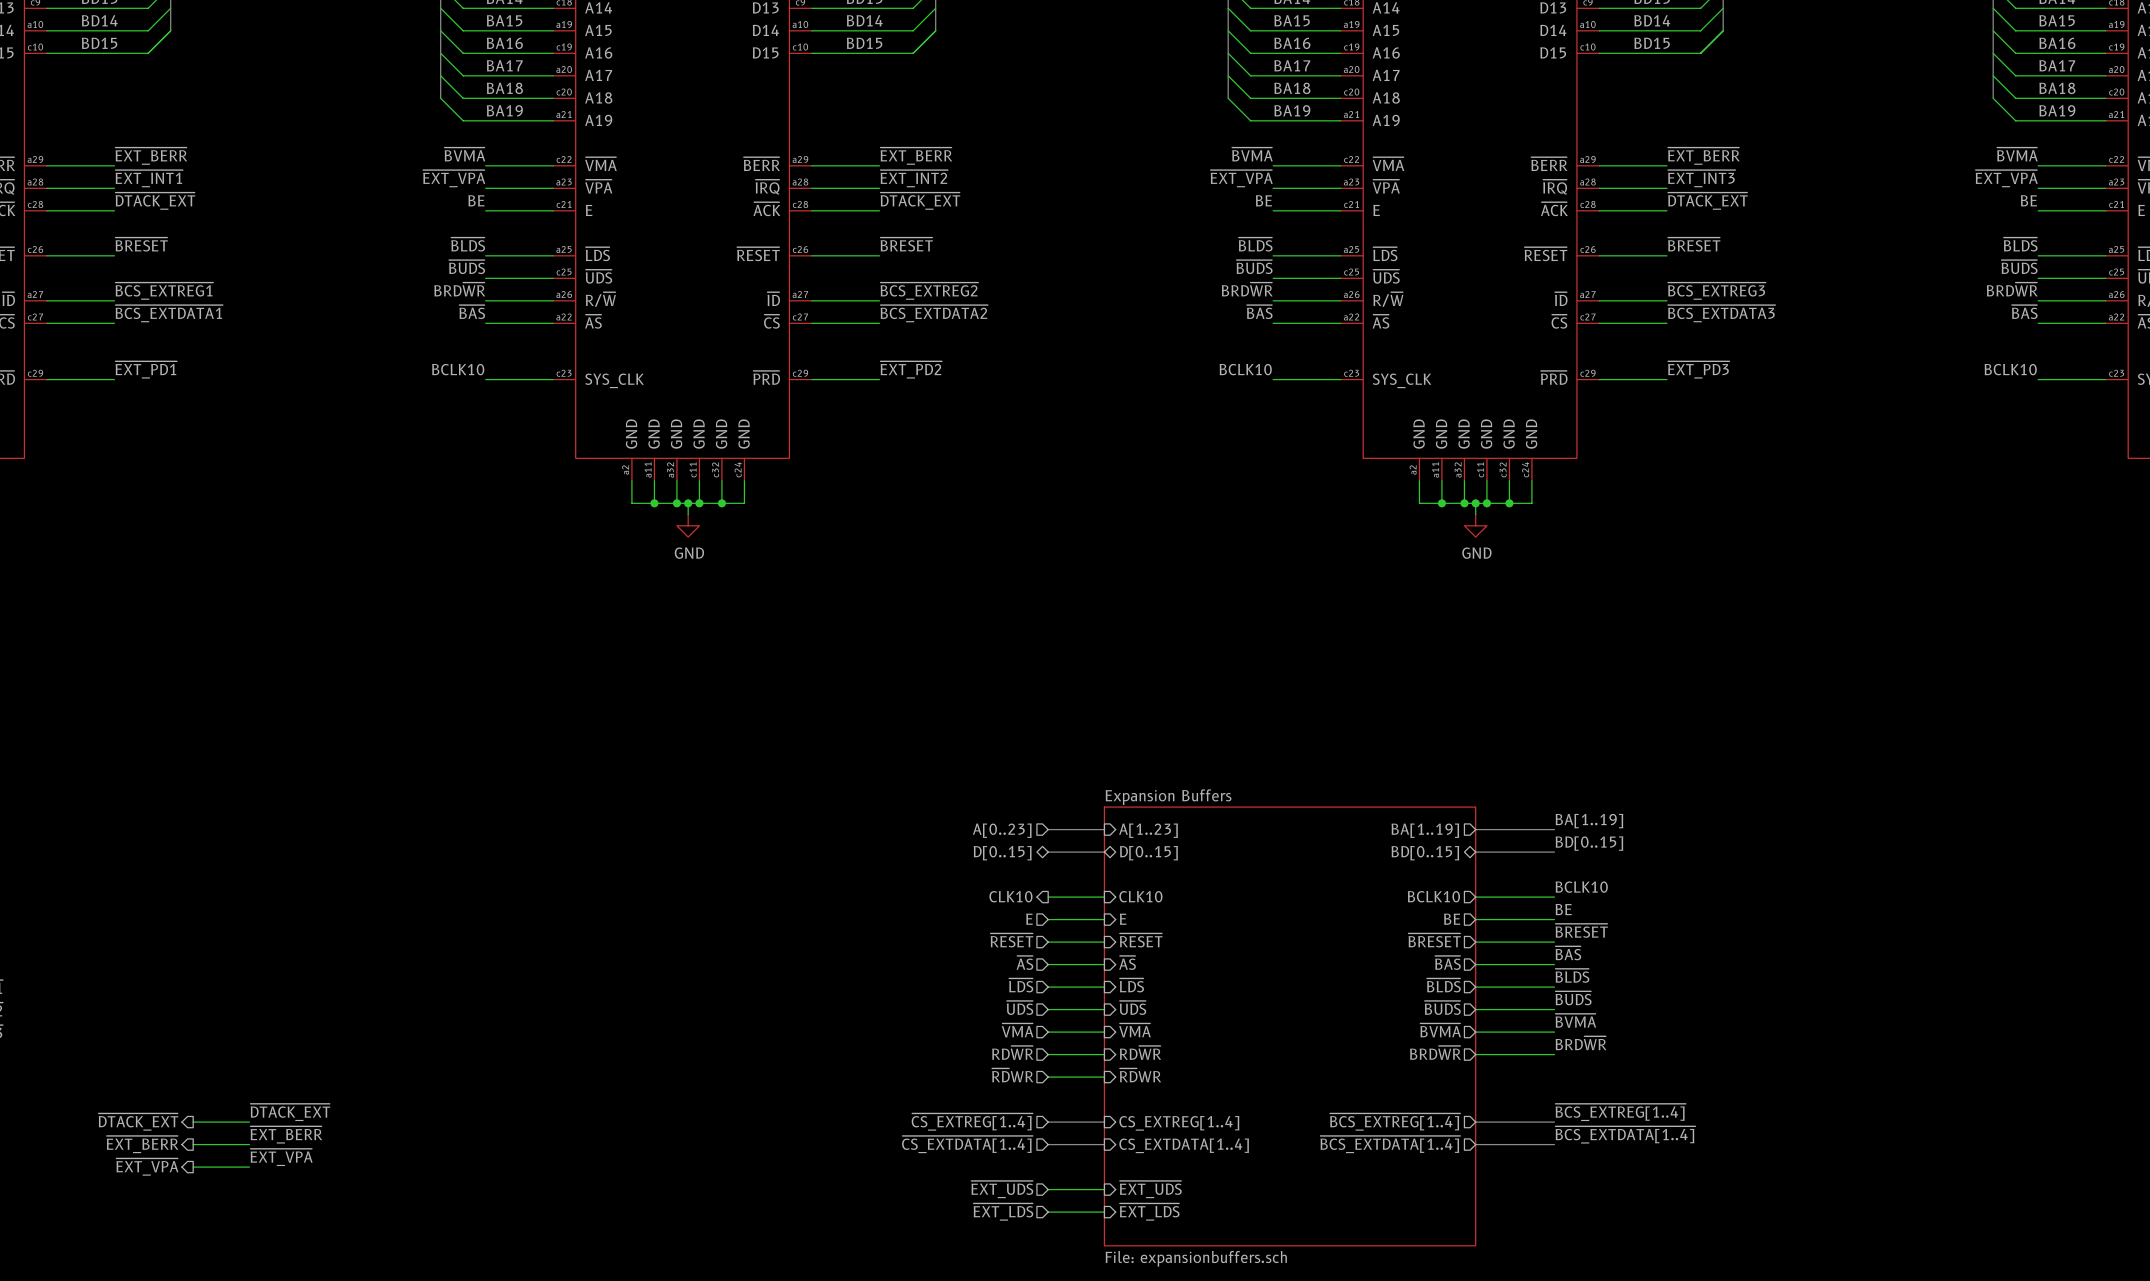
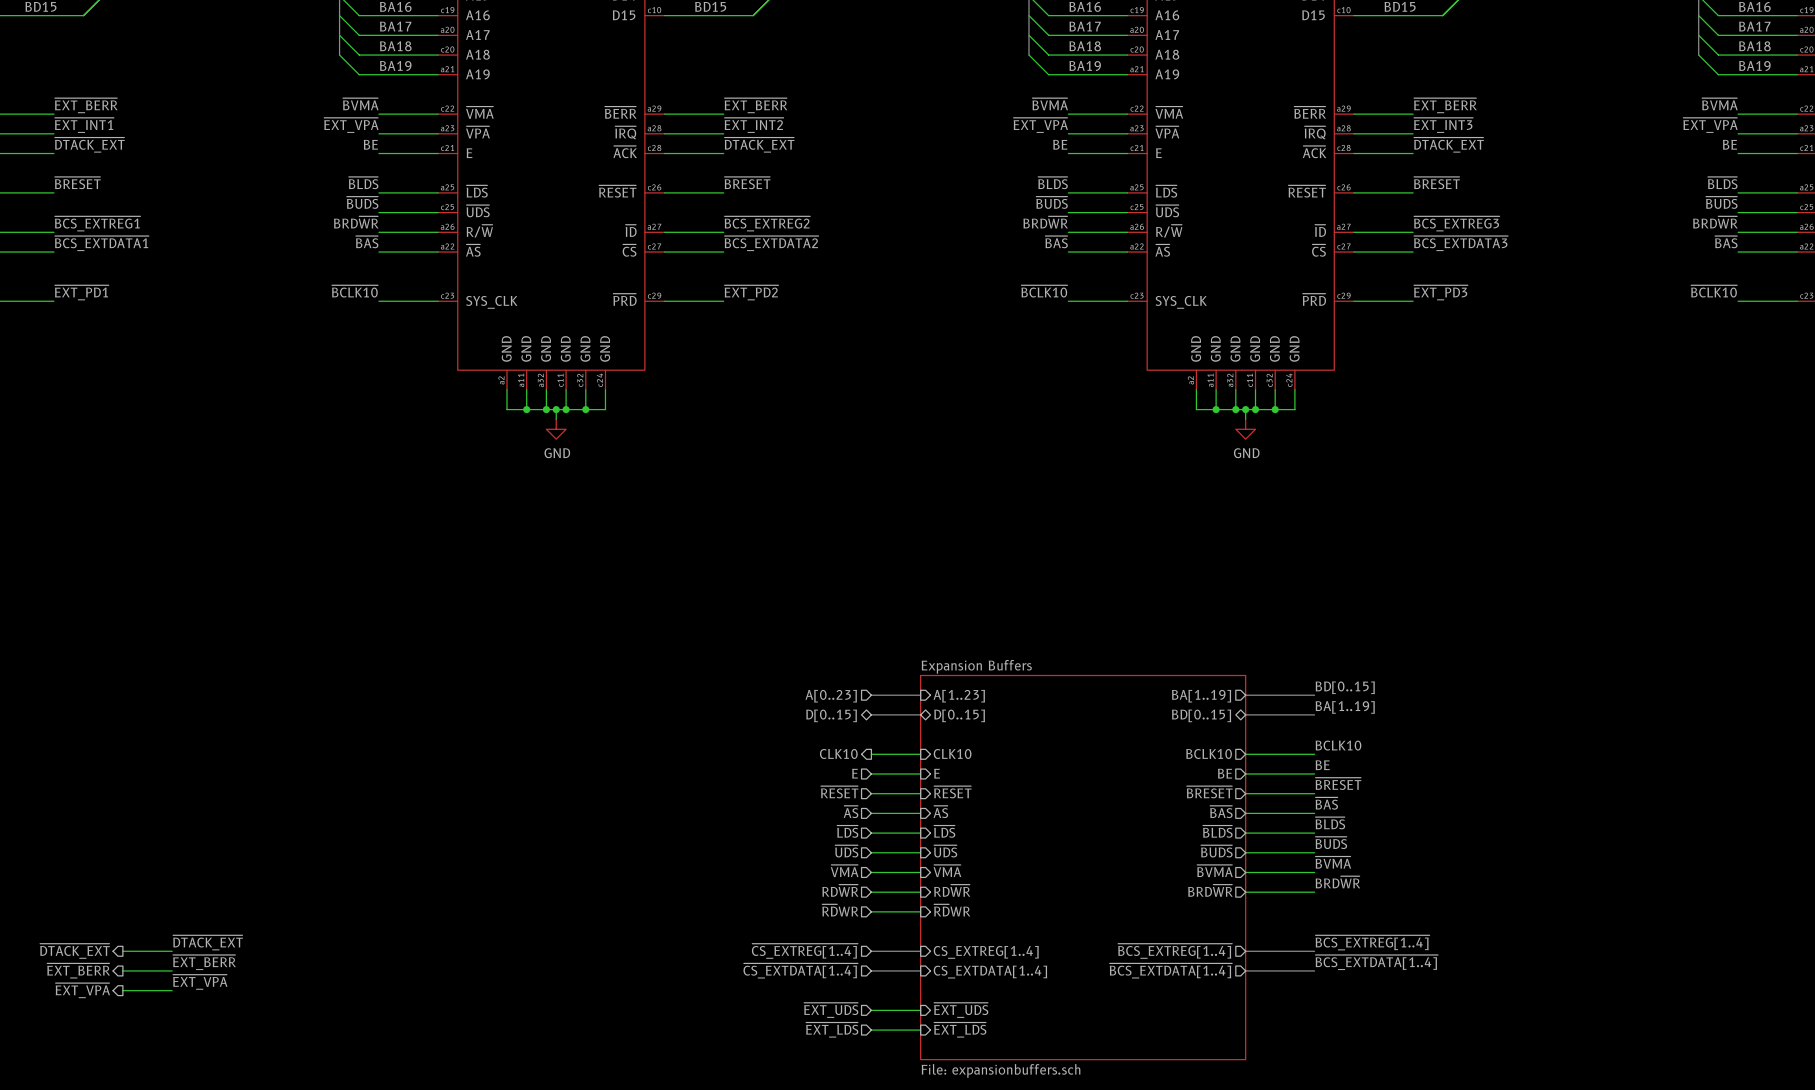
label: BCLK10 (458, 369) -> ~{BCLK10} (354, 291)
label: BCLK10 (1245, 369) -> ~{BCLK10} (1044, 291)
label: BCLK10 (2010, 369) -> ~{BCLK10} (1714, 291)
label: BA[1..19] (1589, 821) -> BD[0..15] (1345, 687)
label: BD[0..15] (1589, 843) -> BA[1..19] (1345, 707)

